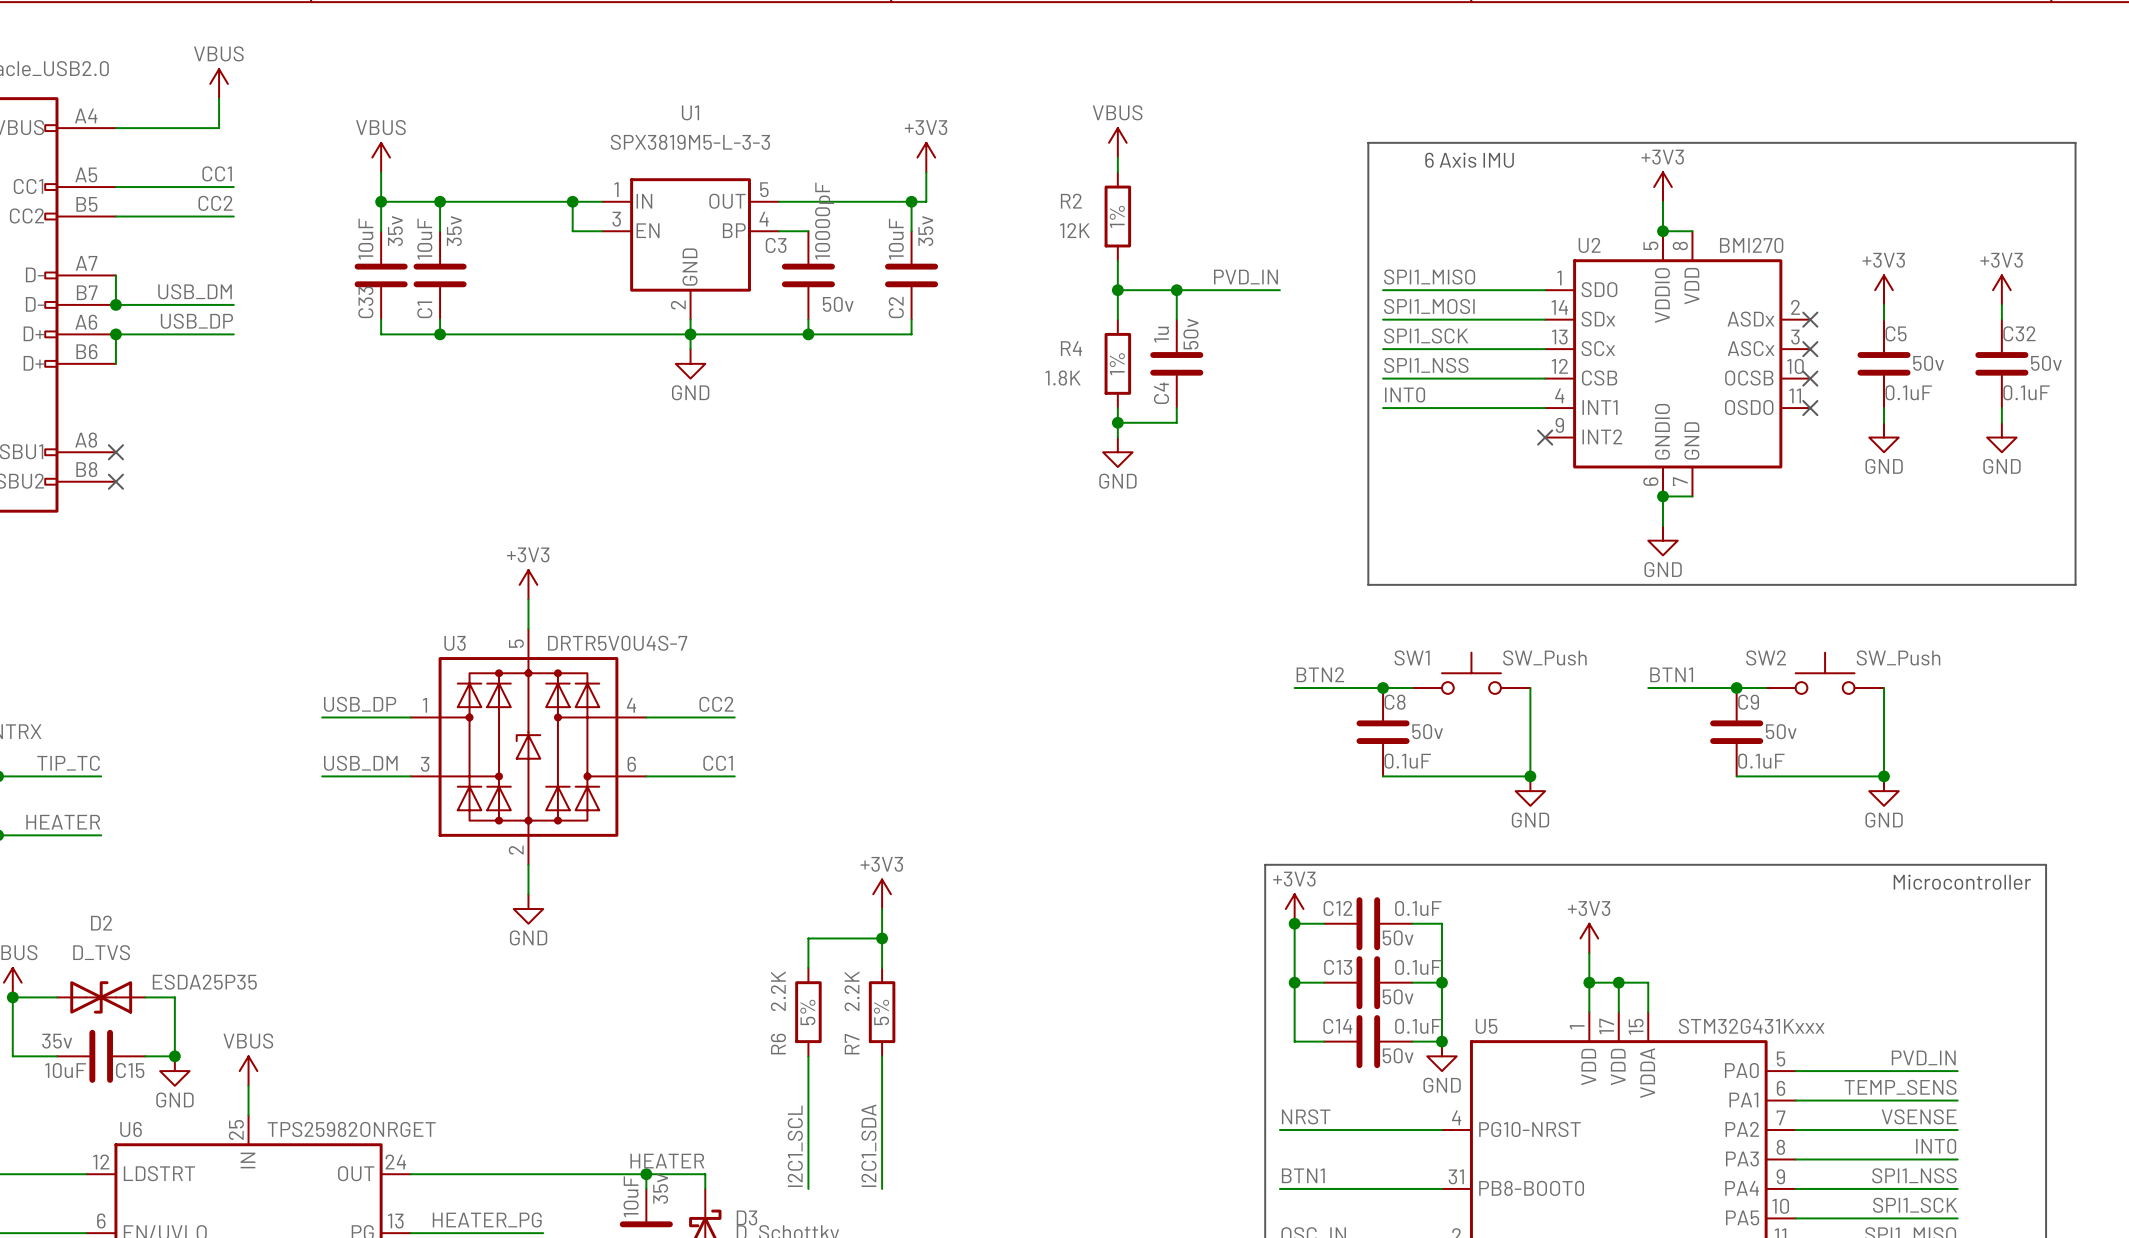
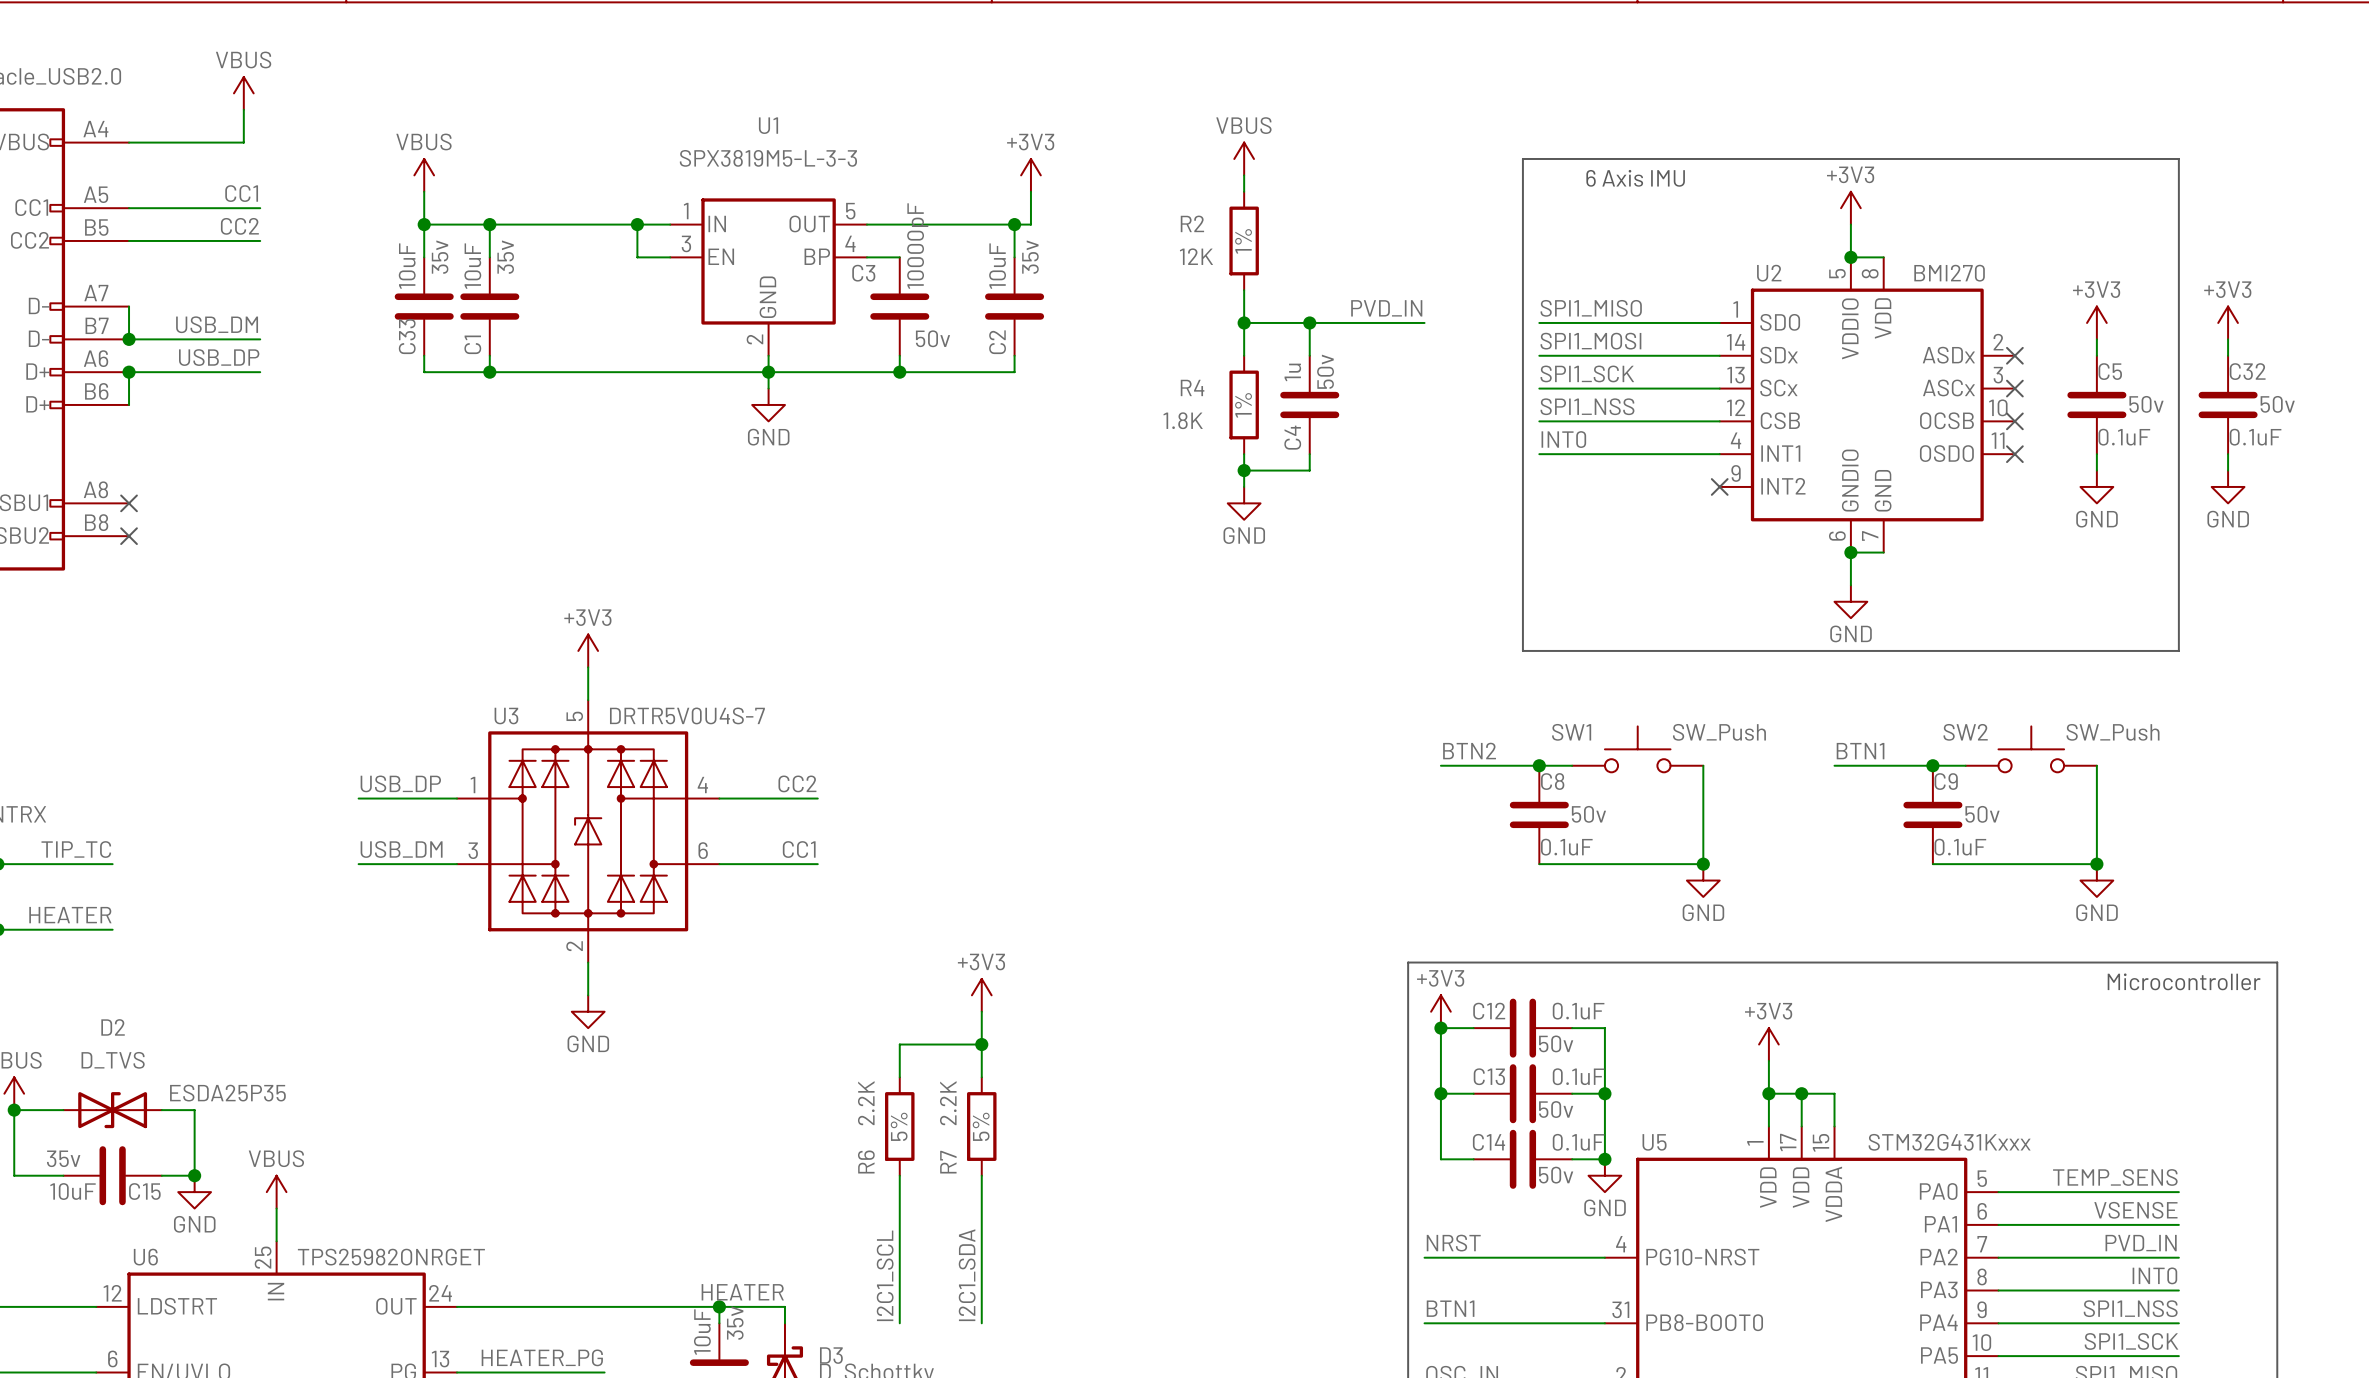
line: (1957, 142) (2075, 142) (2075, 584) (1957, 584) -> (2178, 158) (2178, 650)
label: PVD_IN (1923, 1057) -> TEMP_SENS (2115, 1177)
label: TEMP_SENS (1900, 1087) -> VSENSE (2135, 1210)
label: VSENSE (1919, 1116) -> PVD_IN (2141, 1243)

